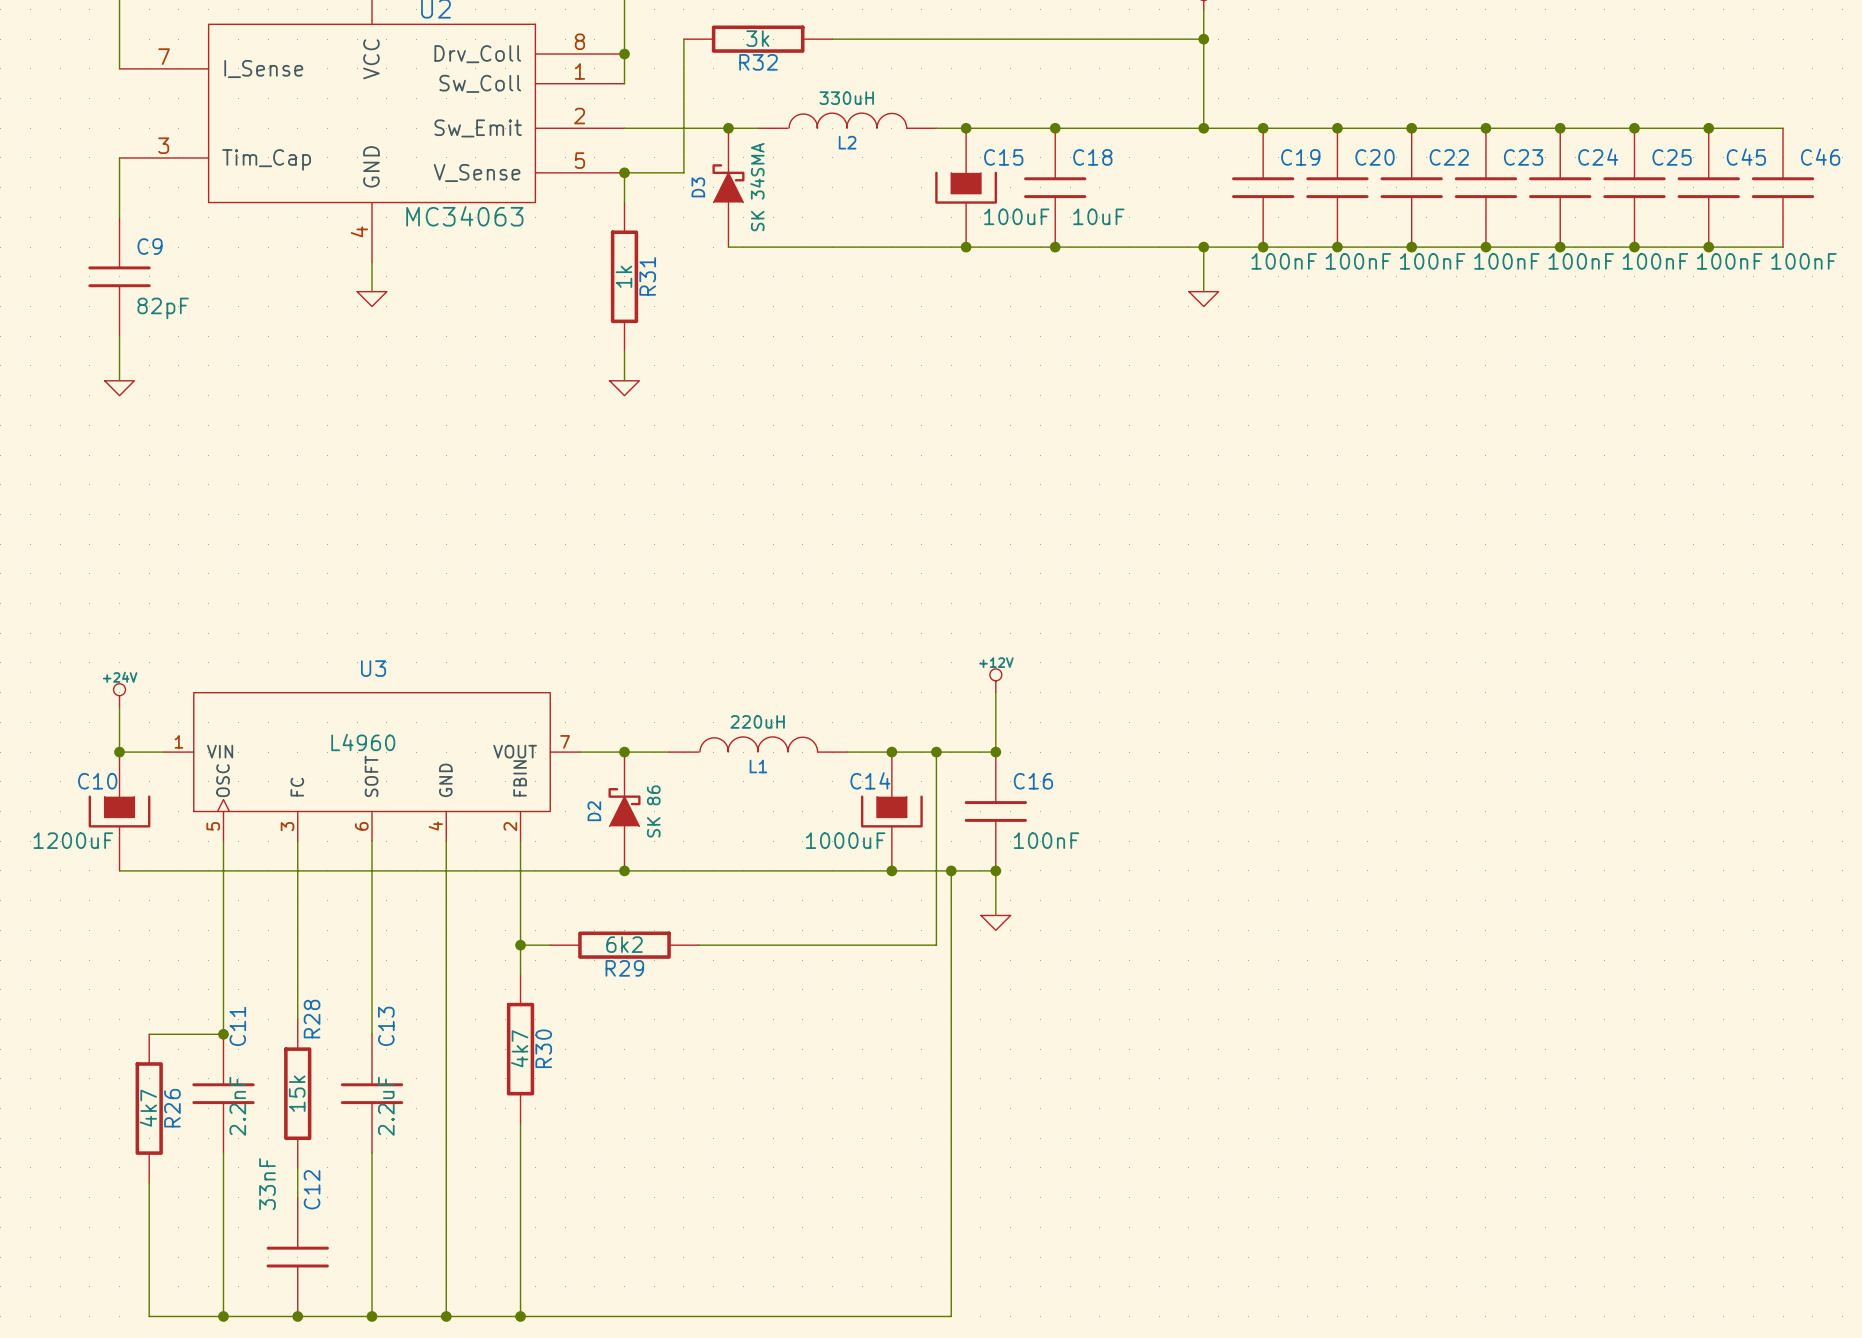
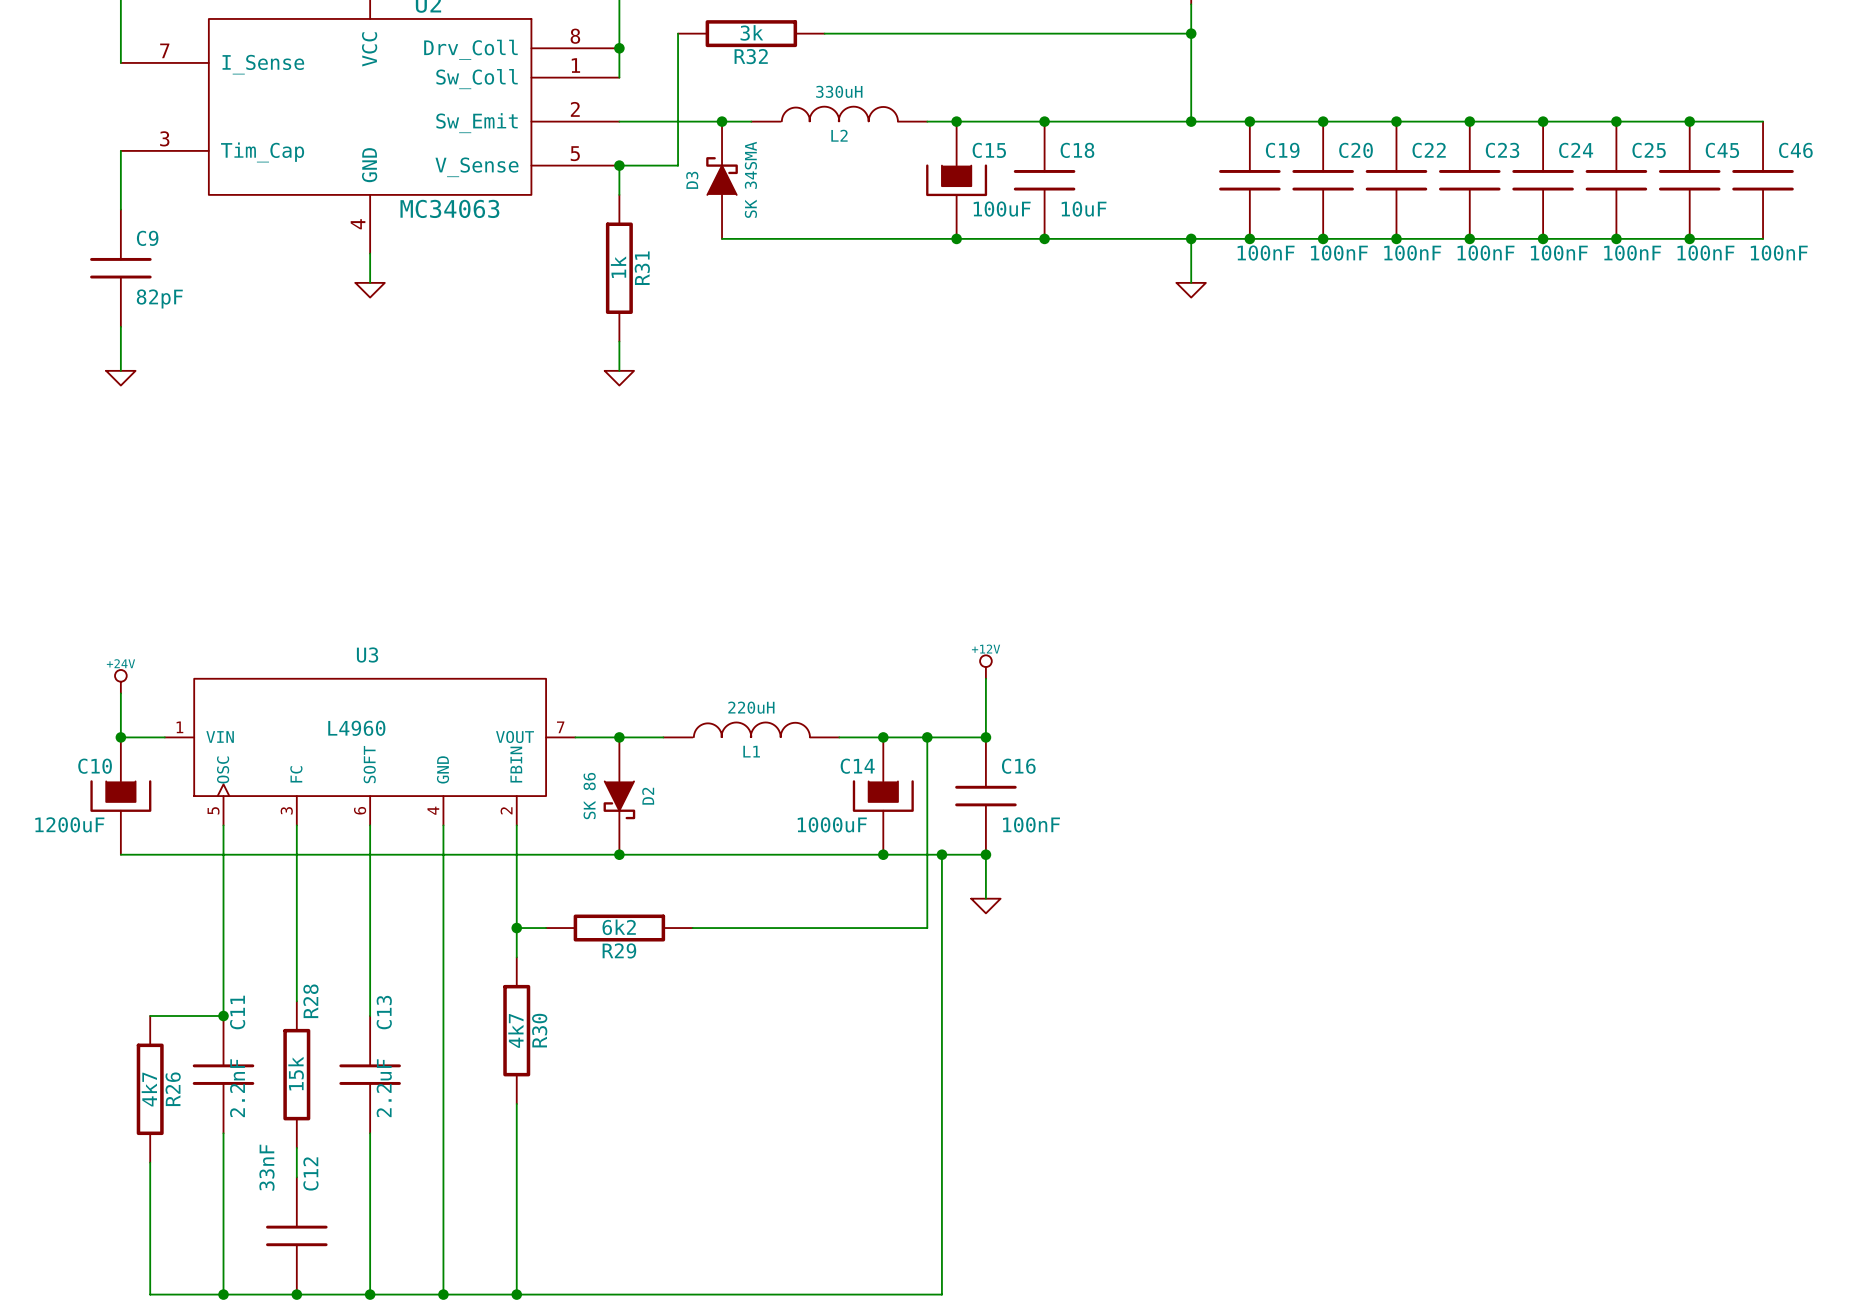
D2 rotation: 0° (624, 807) -> 180° (619, 800)

